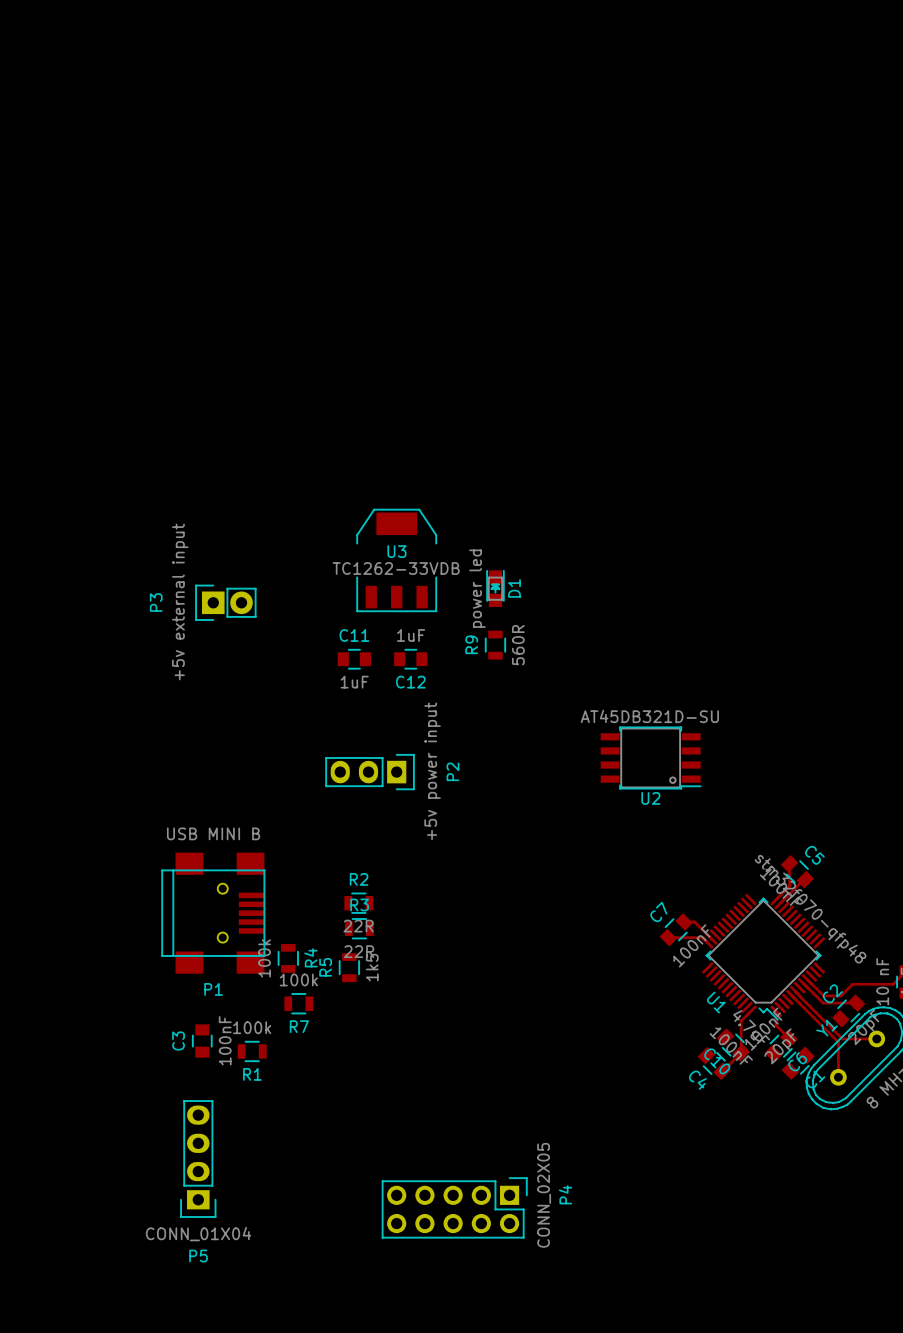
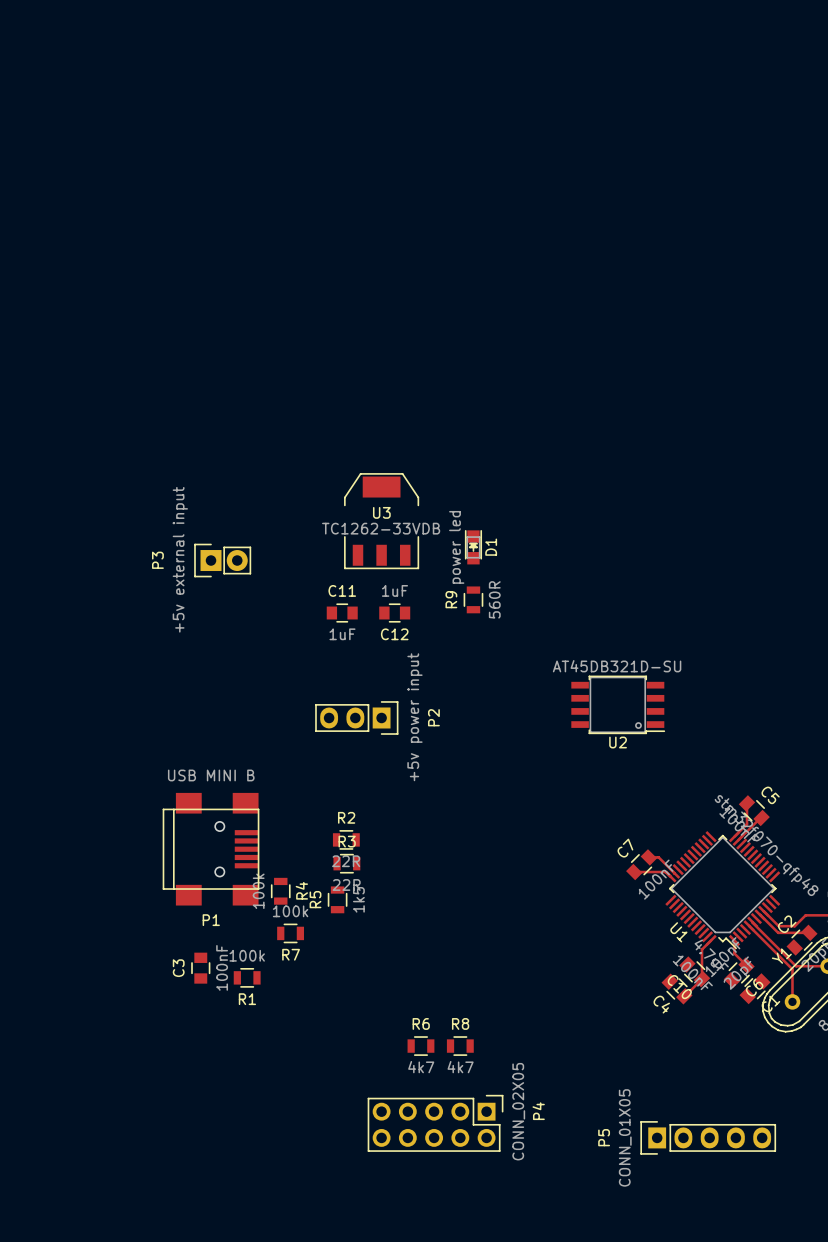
P5 footprint: [180, 1100, 217, 1218] -> [640, 1121, 777, 1155]
R6: none -> 4k7 (420, 1046)
R8: none -> 4k7 (460, 1046)
P5 value: CONN_01X04 (198, 1234) -> CONN_01X05 (625, 1137)
P5 name position: P5 (198, 1256) -> P5 (604, 1137)

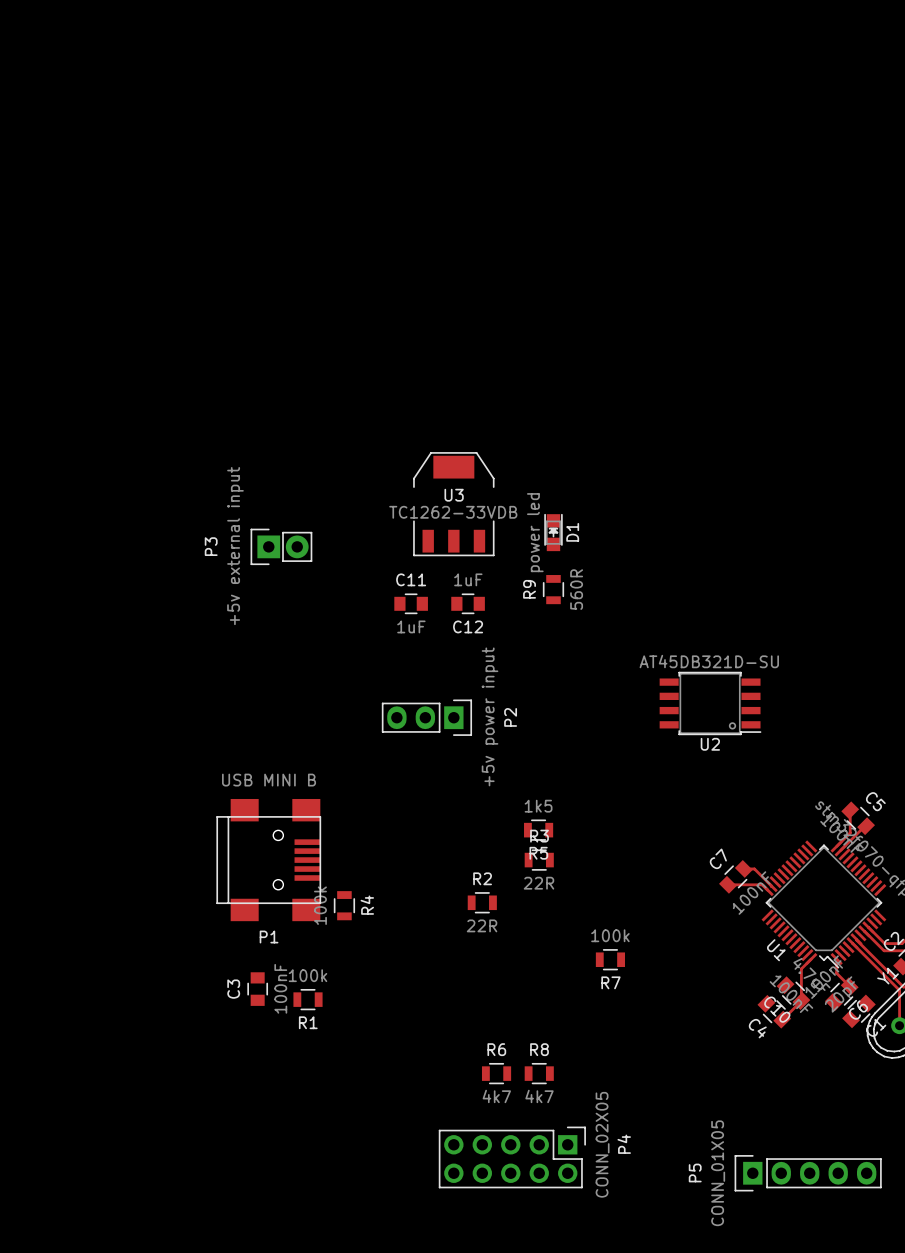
R2 position: (346, 839) -> (482, 902)
R3 position: (346, 863) -> (539, 860)
R5 name position: R5 (315, 899) -> R5 (538, 853)
R5 rotation: 0° (337, 899) -> 90° clockwise (538, 830)
R5 position: (337, 899) -> (538, 830)
R5 value position: 1k5 (358, 899) -> 1k5 (538, 806)
R7 position: (290, 933) -> (610, 959)

